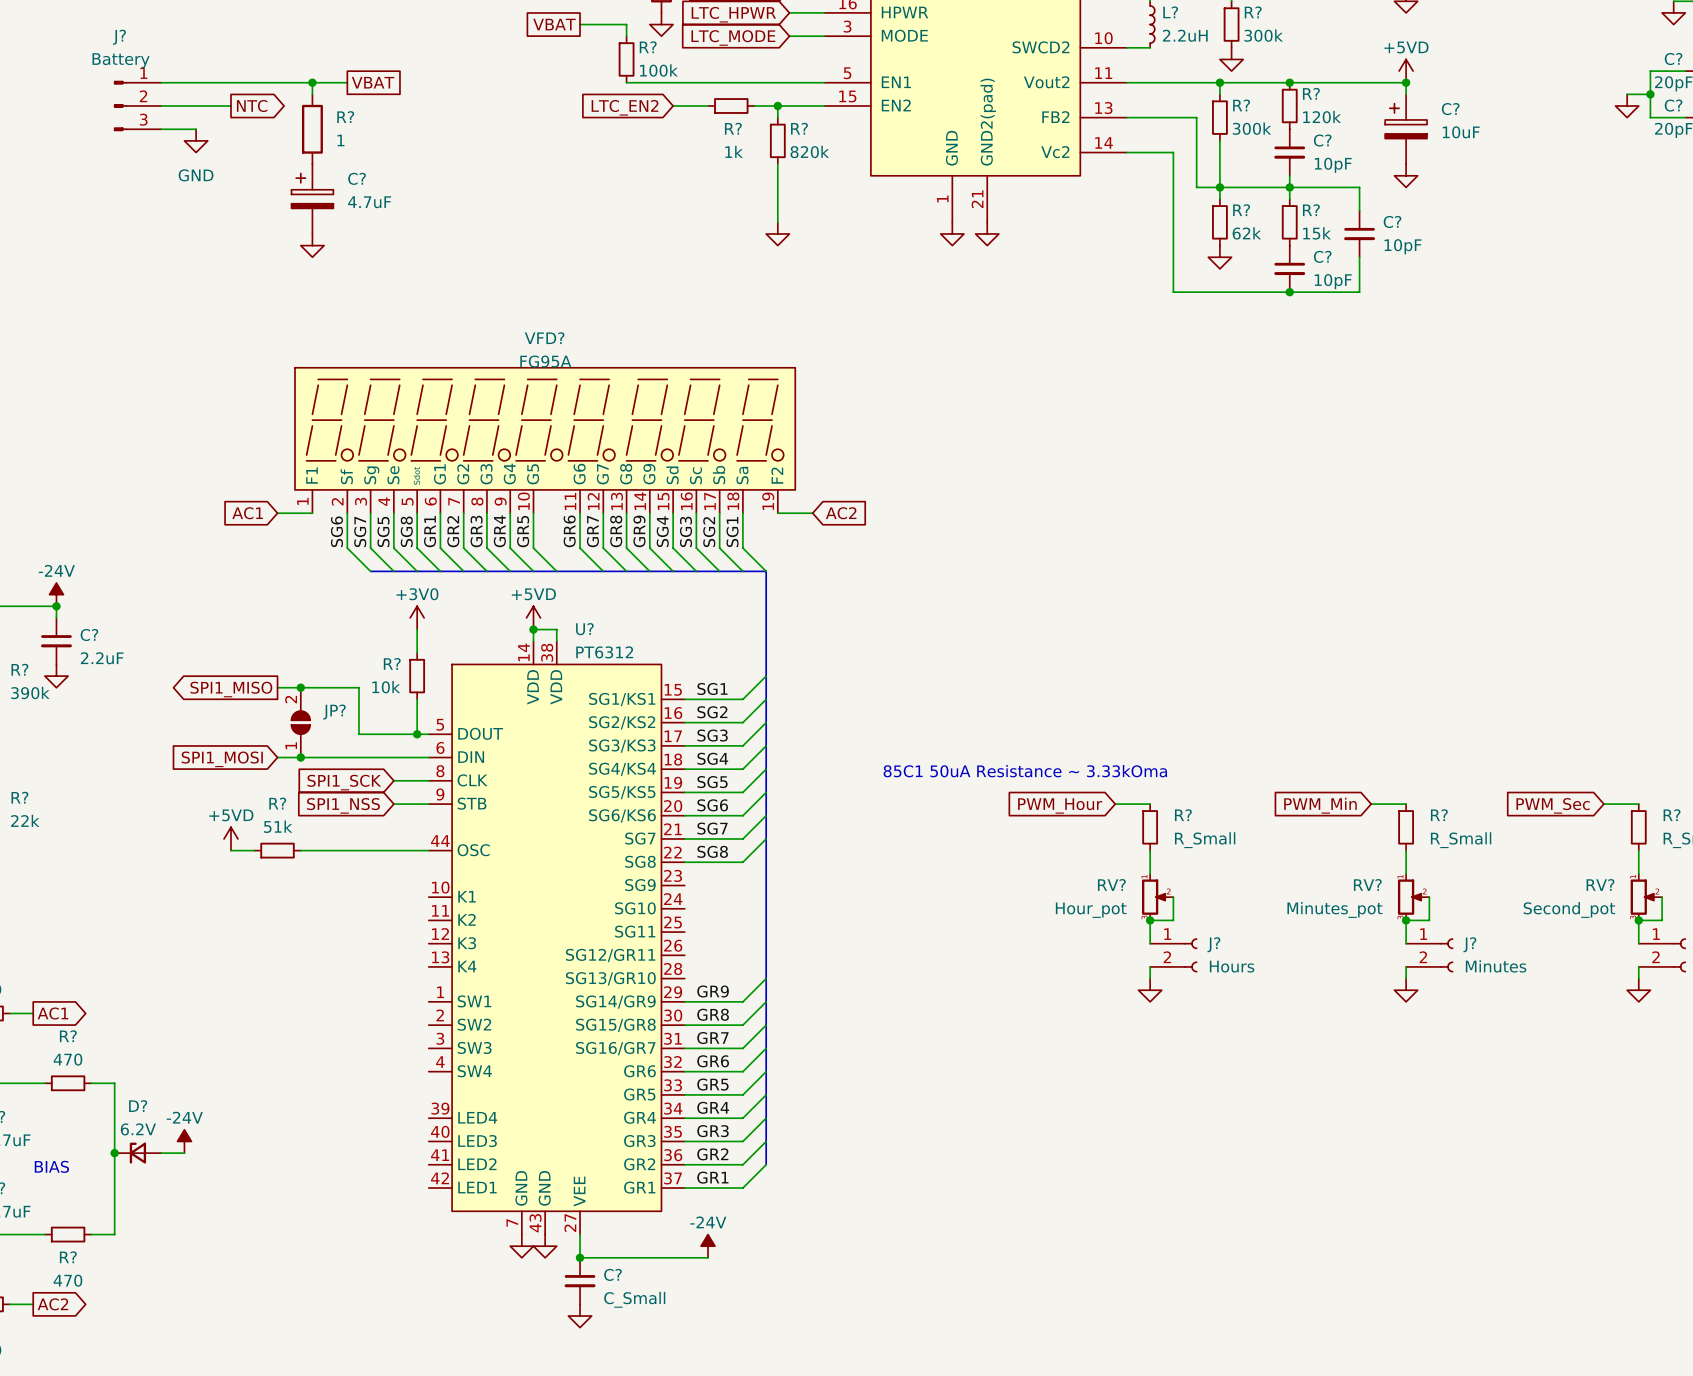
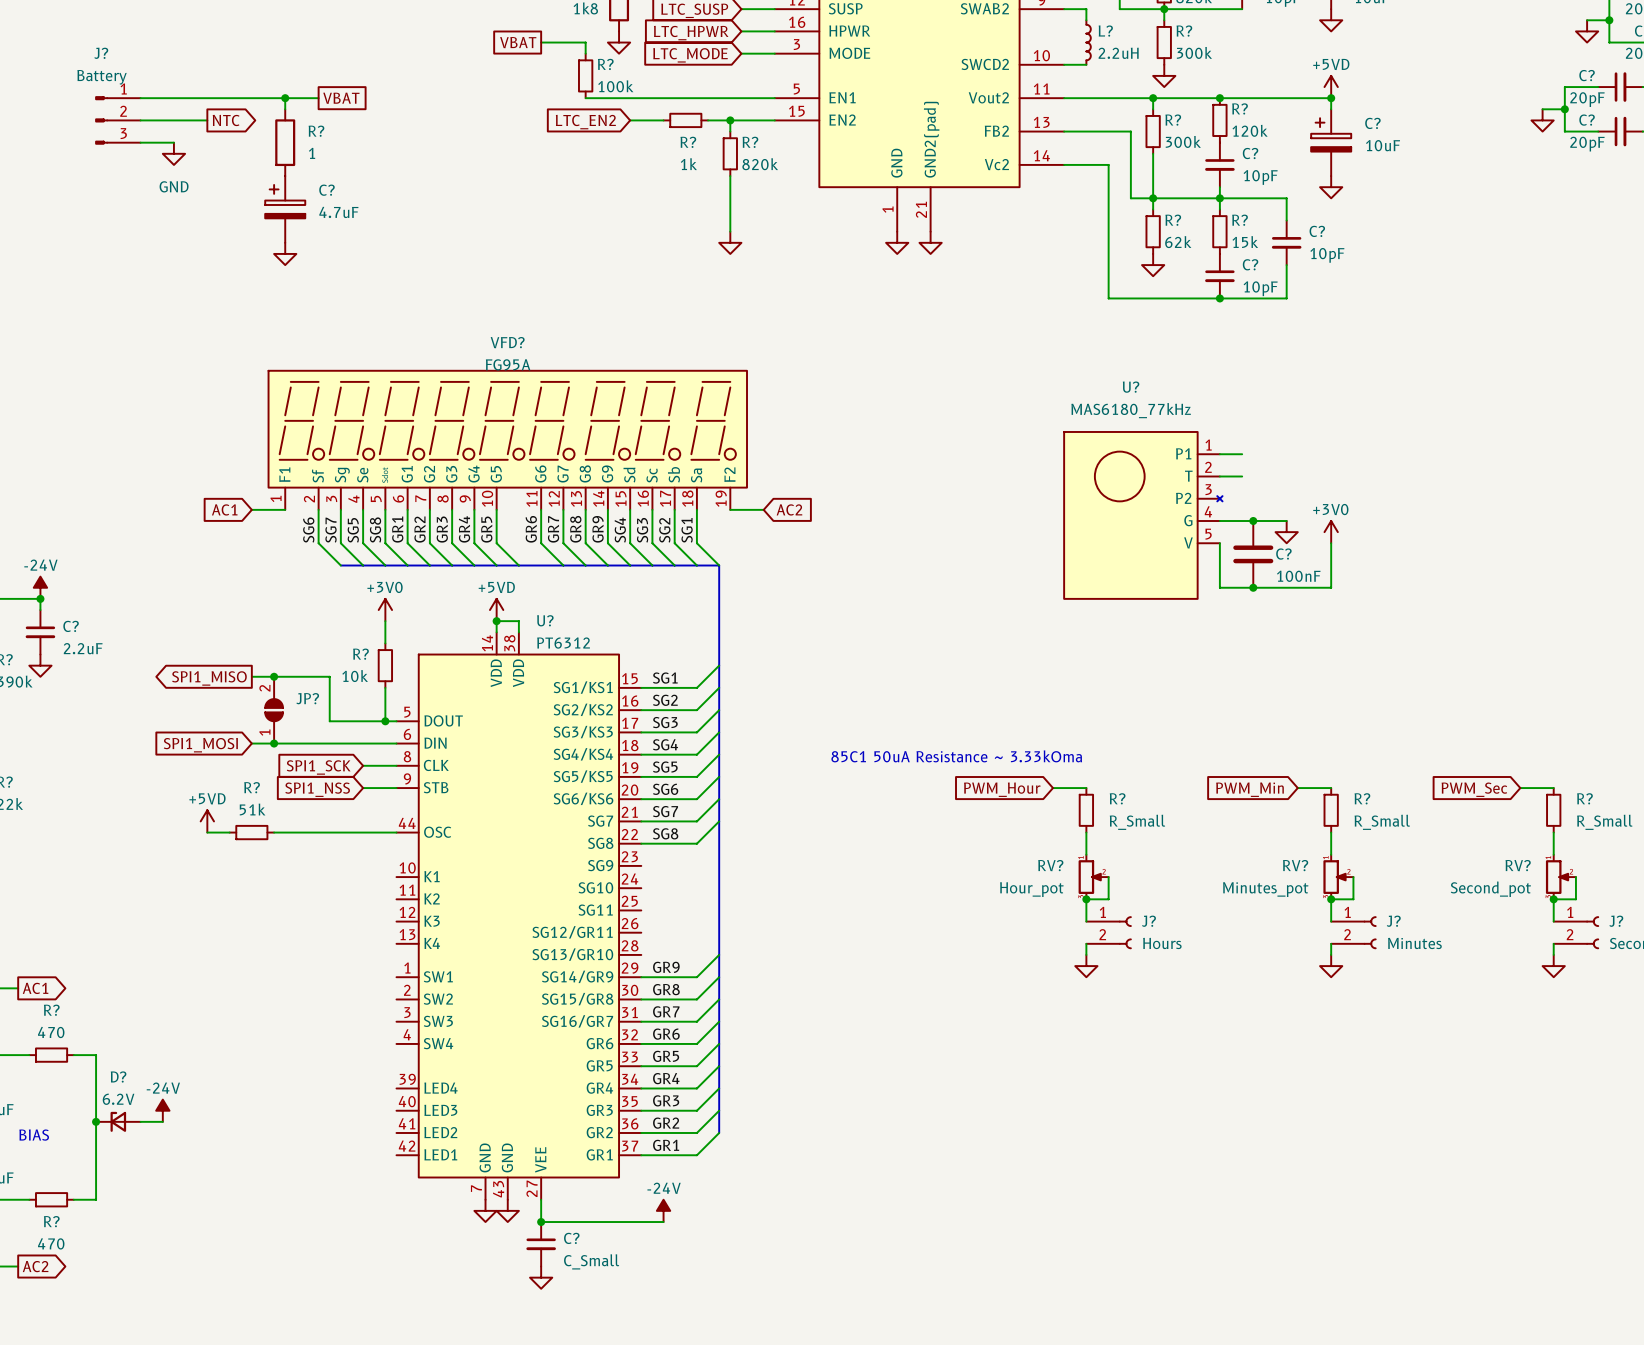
wire: none -> (1219, 454) (1242, 454)
wire: none -> (1219, 476) (1242, 476)
U?: none -> MAS6180_77kHz (1143, 515)
wire: none -> (1219, 521) (1286, 521)
junction: none -> (1253, 521)
power symbol: none -> (1286, 532)
power symbol: none -> +3V0 (1331, 532)
wire: none -> (1219, 543) (1219, 587) (1331, 587) (1331, 543)
C?: none -> 100nF (1253, 554)
junction: none -> (1253, 587)

